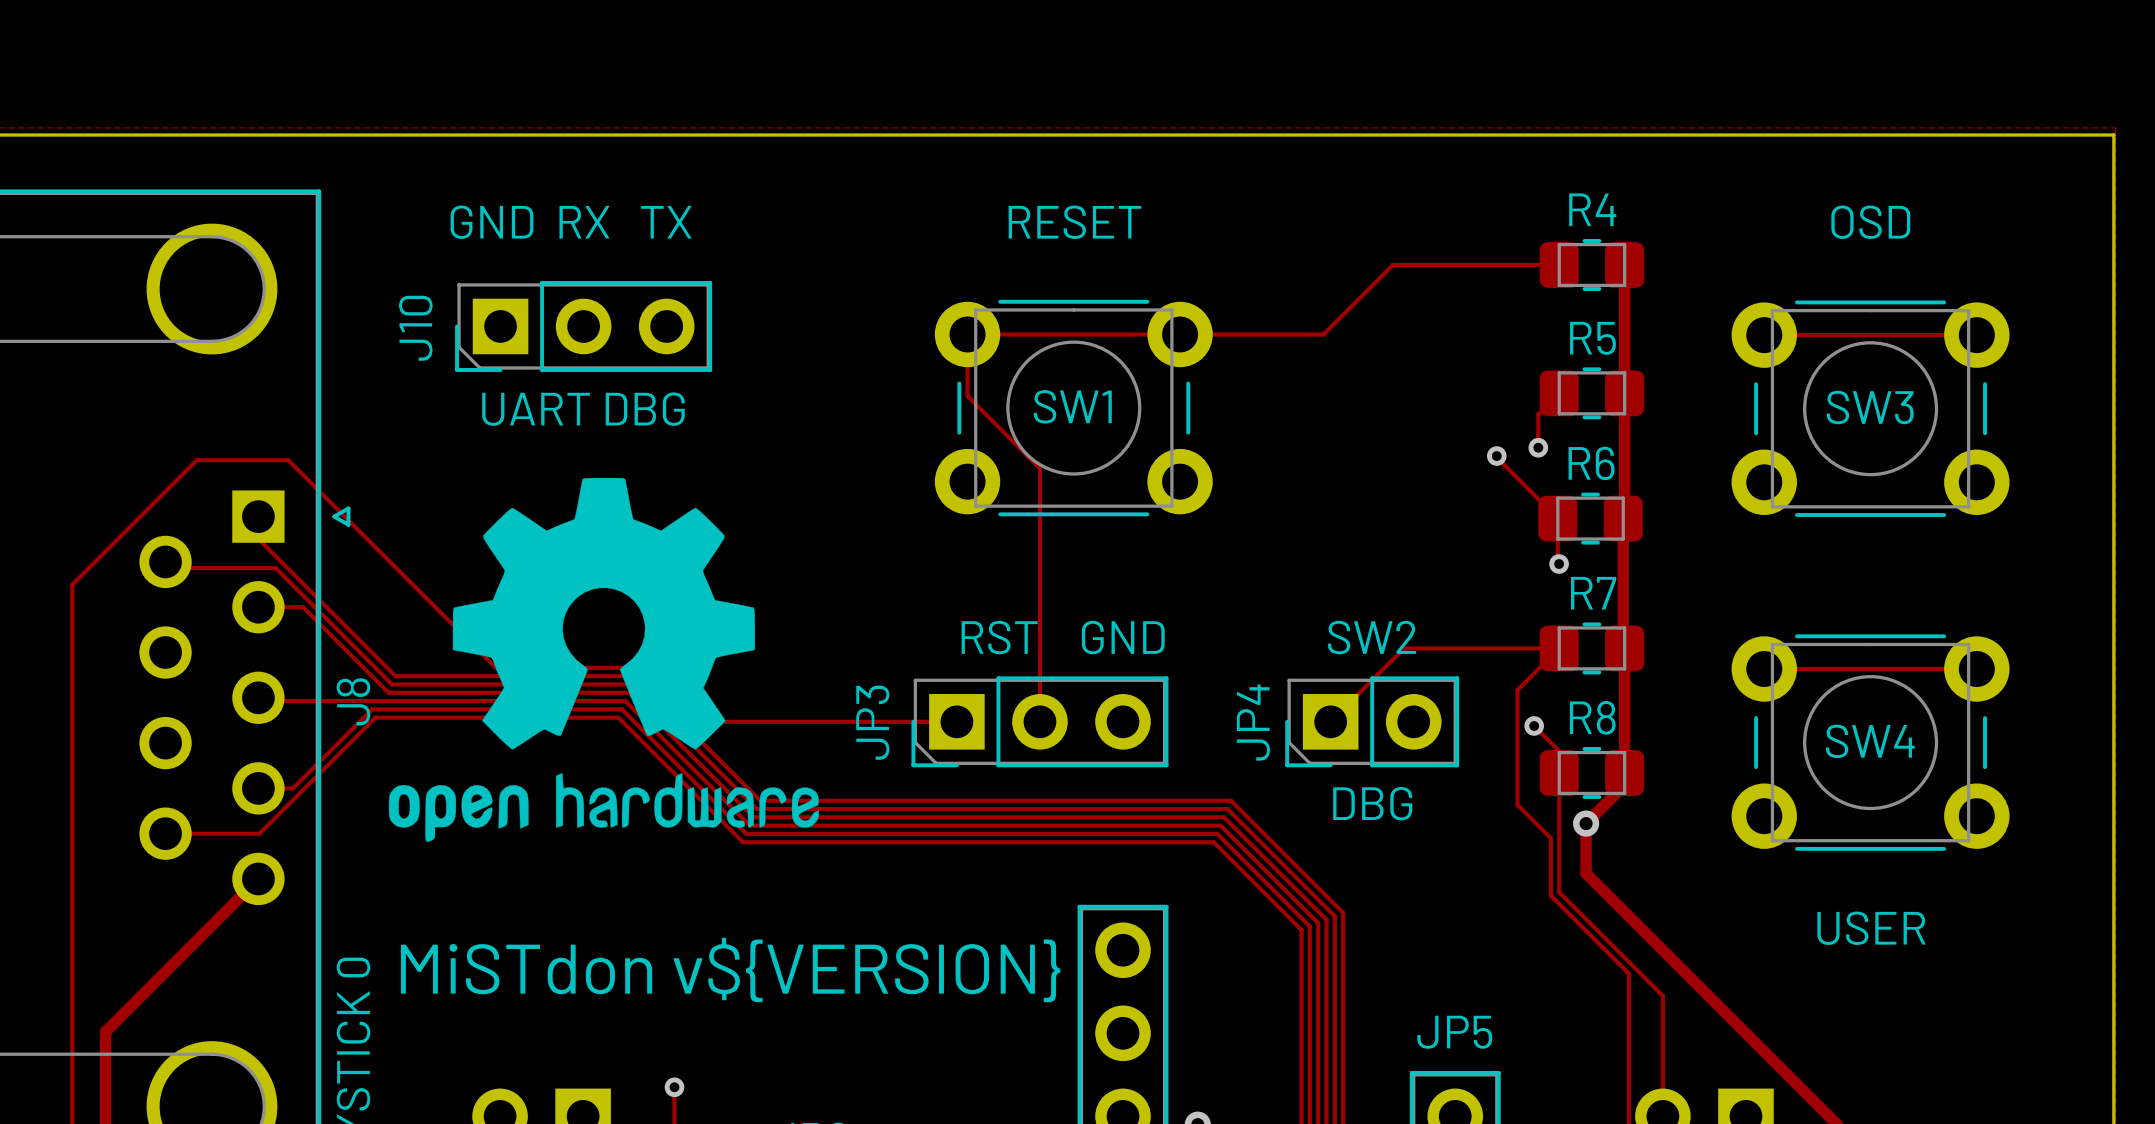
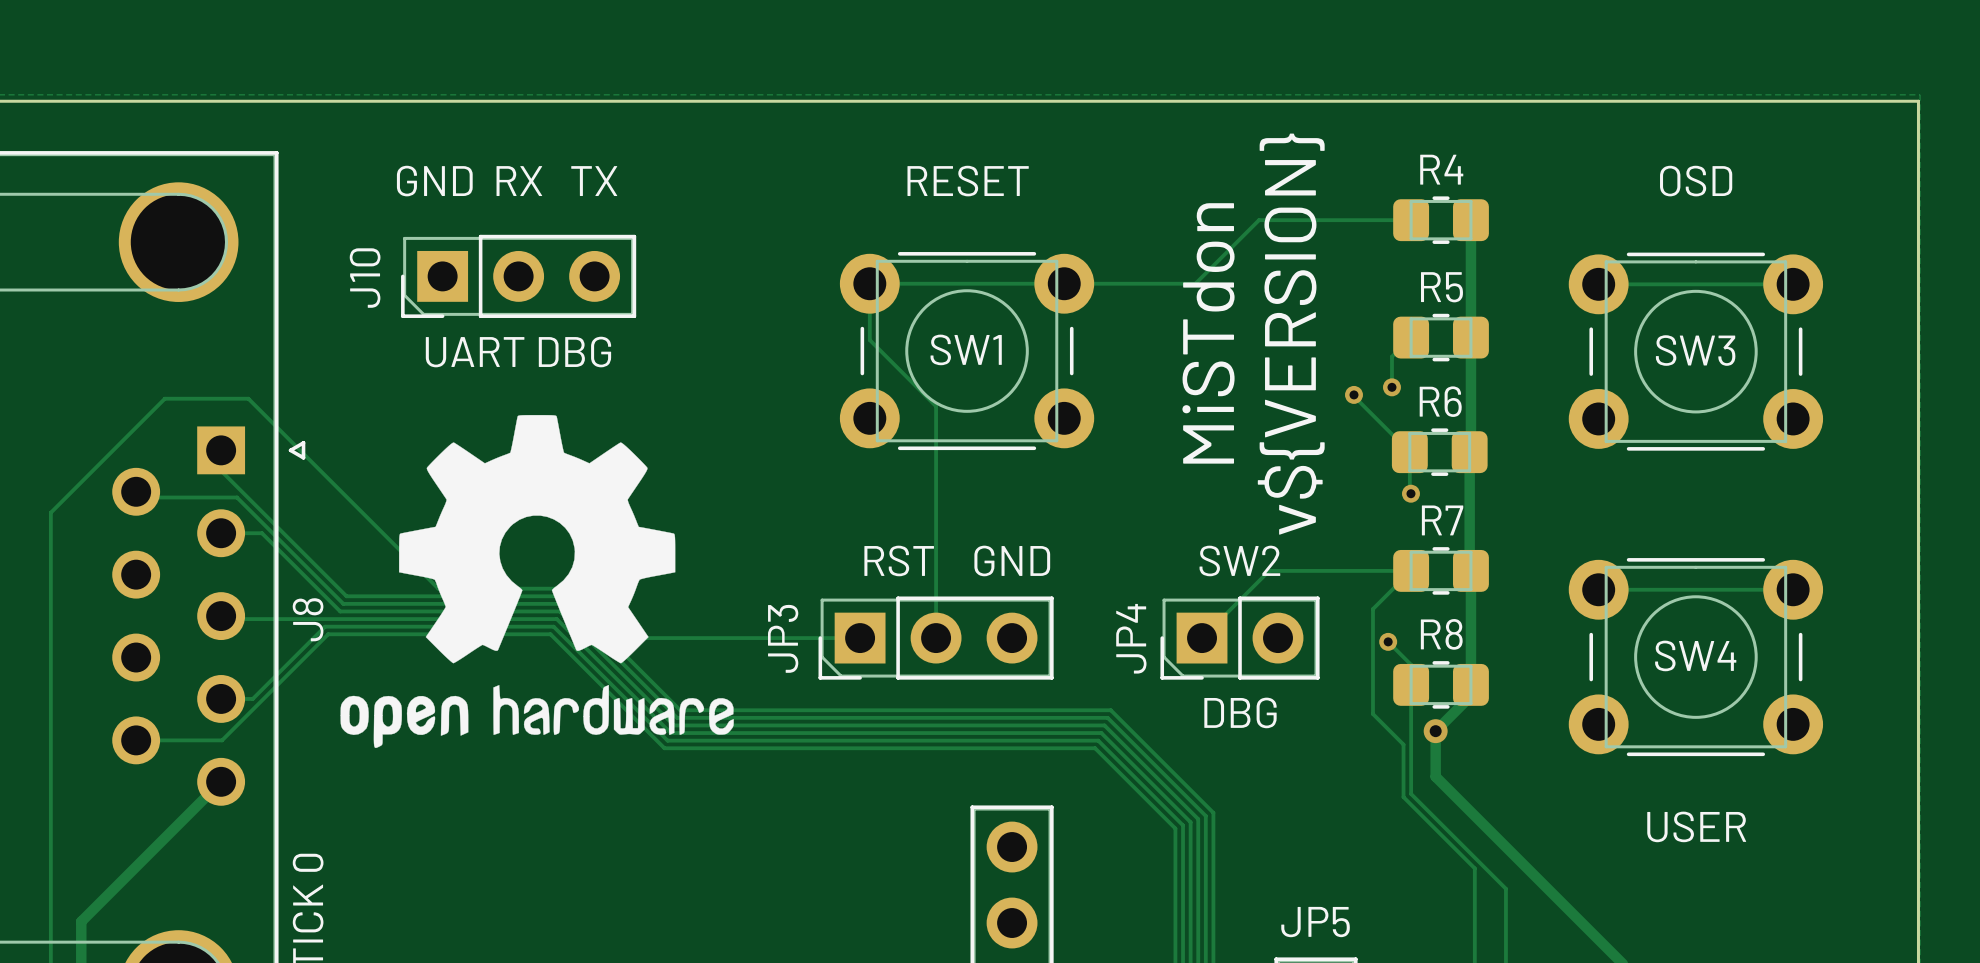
text: none -> MiSTdon (1208, 333)
text: none -> v${VERSION} (1291, 334)
text: MiSTdon v${VERSION} (730, 969) -> none

